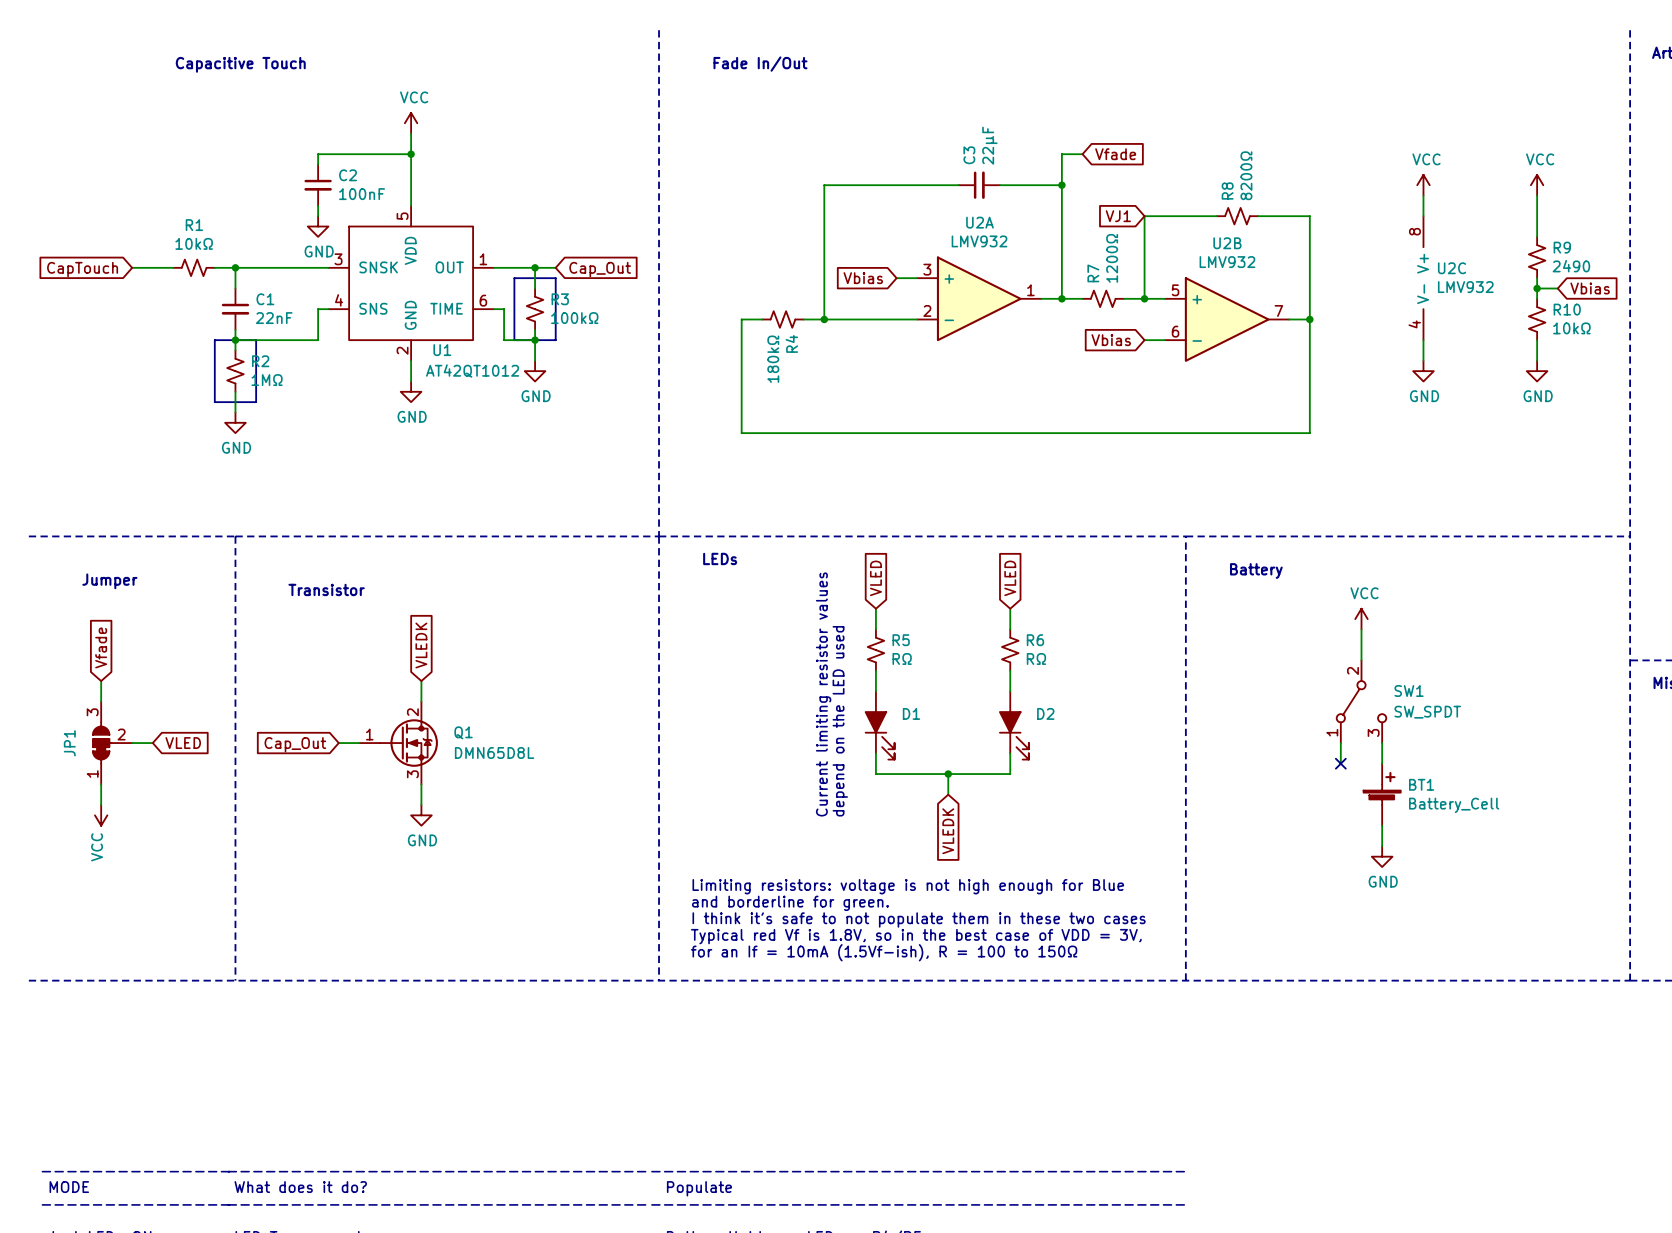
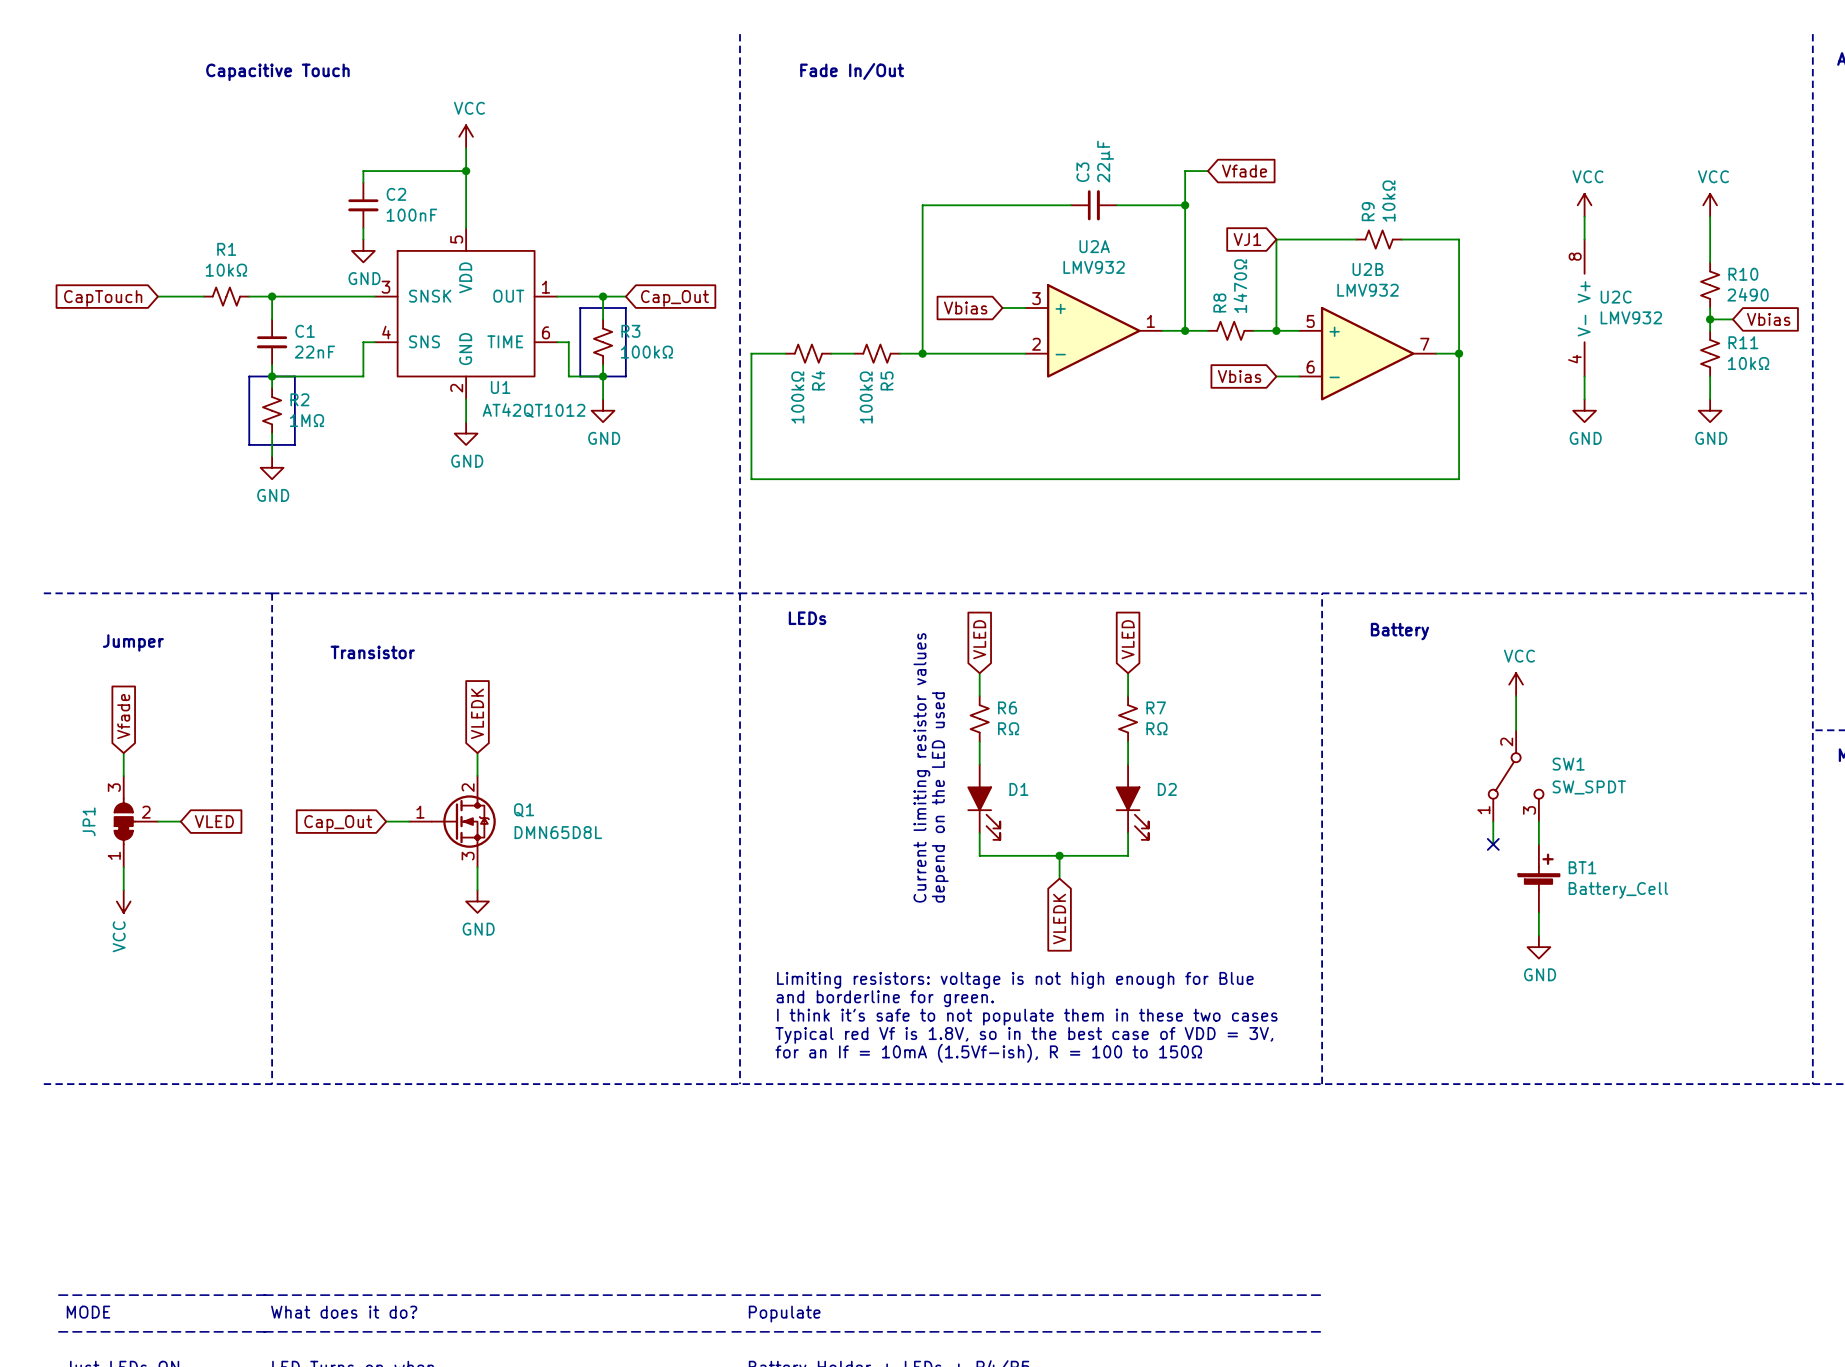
R8 value: 8200Ω (1246, 175) -> 10kΩ (1388, 201)
R8 name: R8 (1227, 190) -> R9 (1368, 211)
R9 name: R9 (1562, 247) -> R10 (1743, 274)
R7 value: 1200Ω (1112, 258) -> 1470Ω (1240, 286)
R7 name: R7 (1093, 273) -> R8 (1219, 302)
R10 name: R10 (1567, 309) -> R11 (1743, 342)
R4: none -> 100kΩ (808, 353)
wire: (741, 319) (741, 433) -> (785, 353) (751, 353) (751, 479) (831, 479)
R4 name: R4 (791, 343) -> R5 (887, 380)
R4 value: 180kΩ (773, 359) -> 100kΩ (866, 397)
R5 name: R5 (901, 640) -> R6 (1007, 707)
R6 name: R6 (1035, 640) -> R7 (1156, 707)

